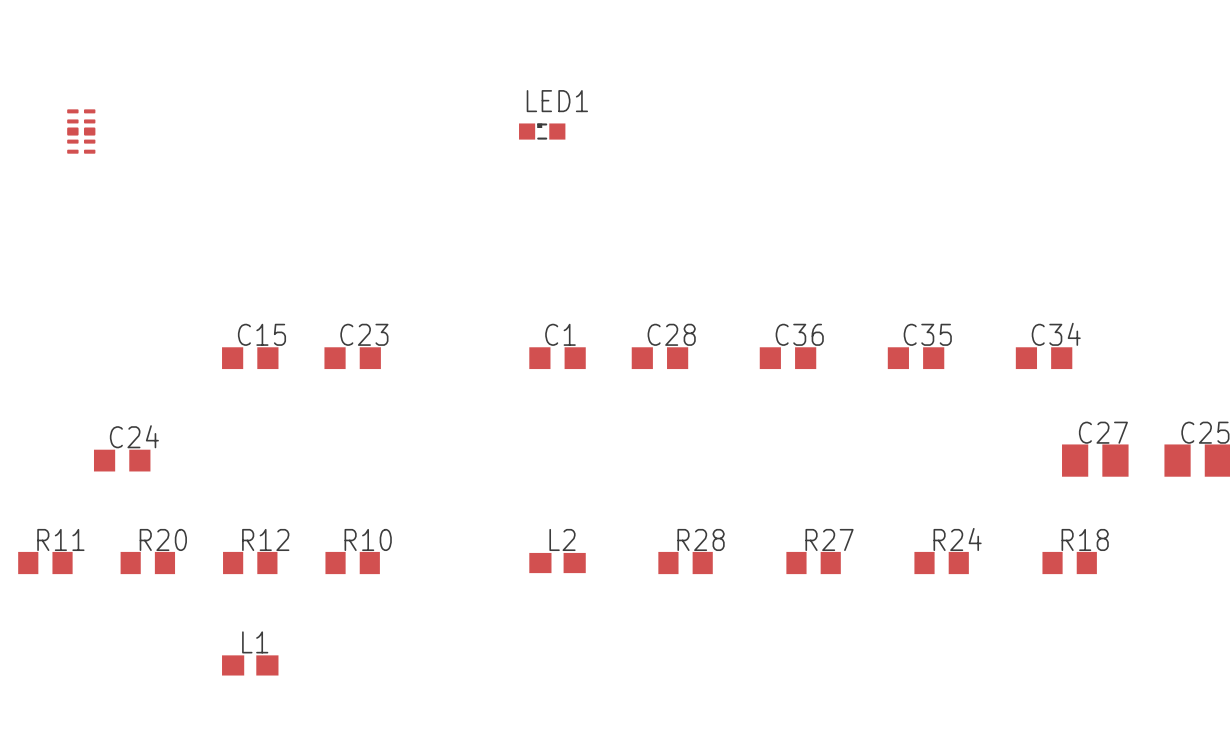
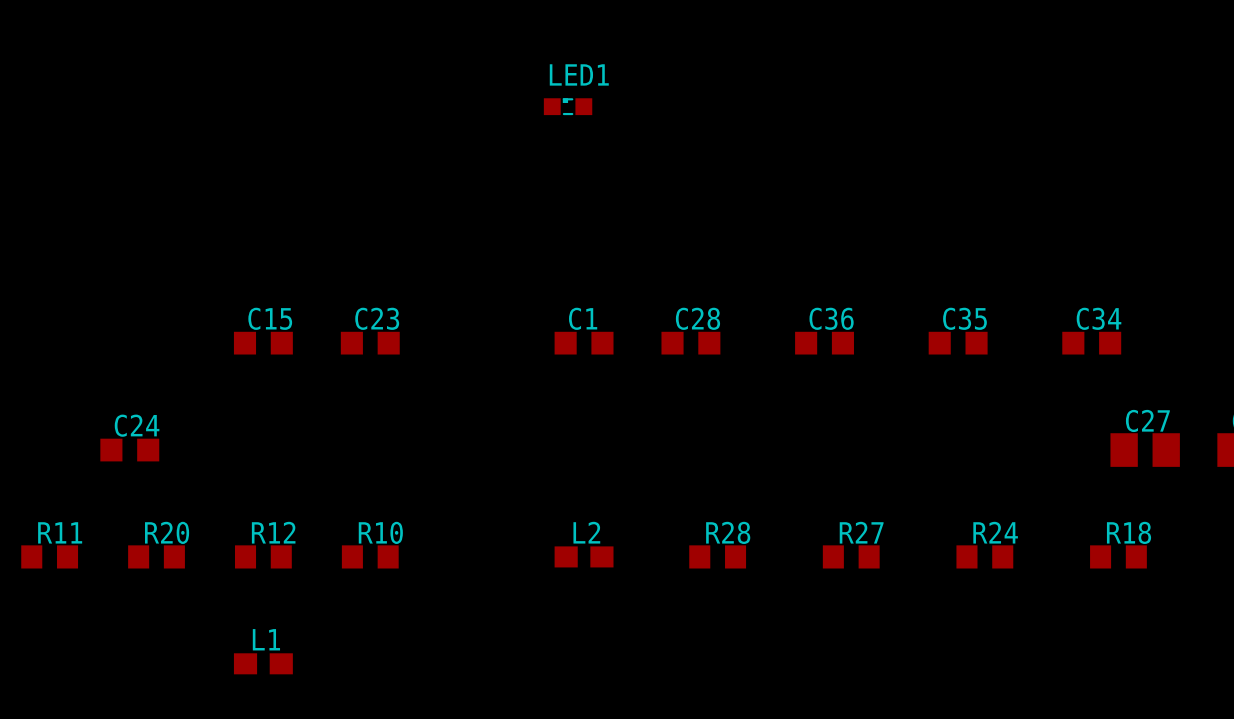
part: (81, 131) -> none

